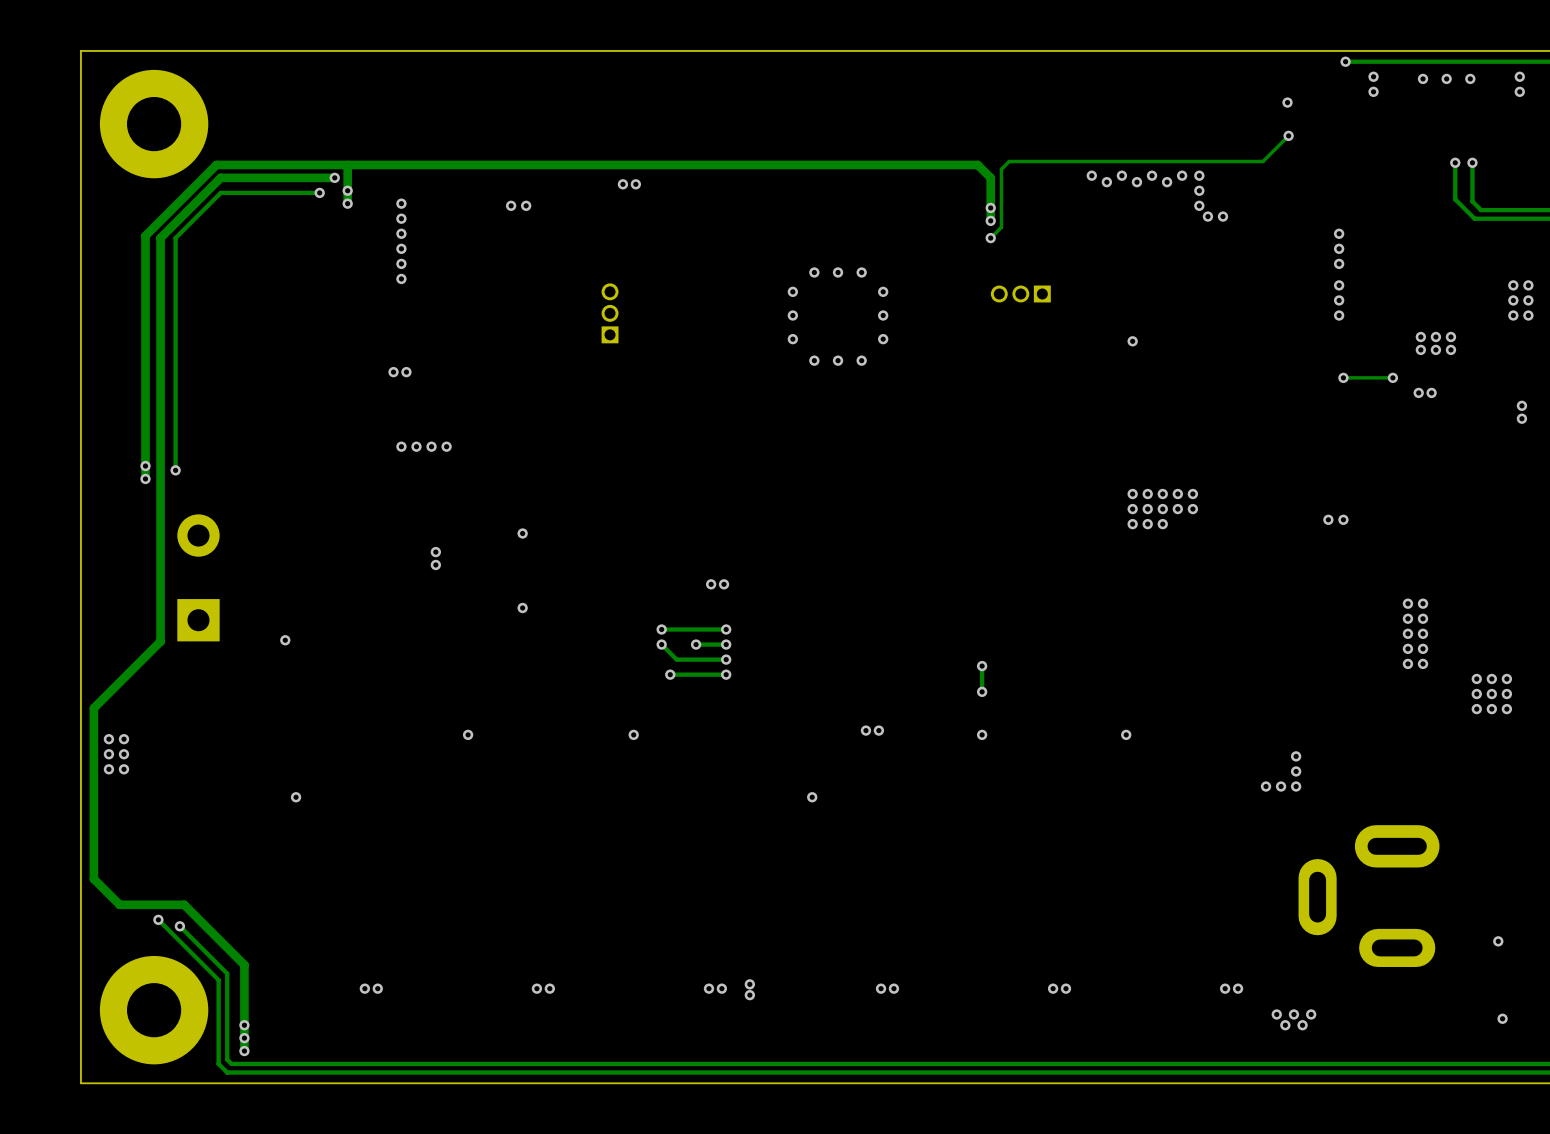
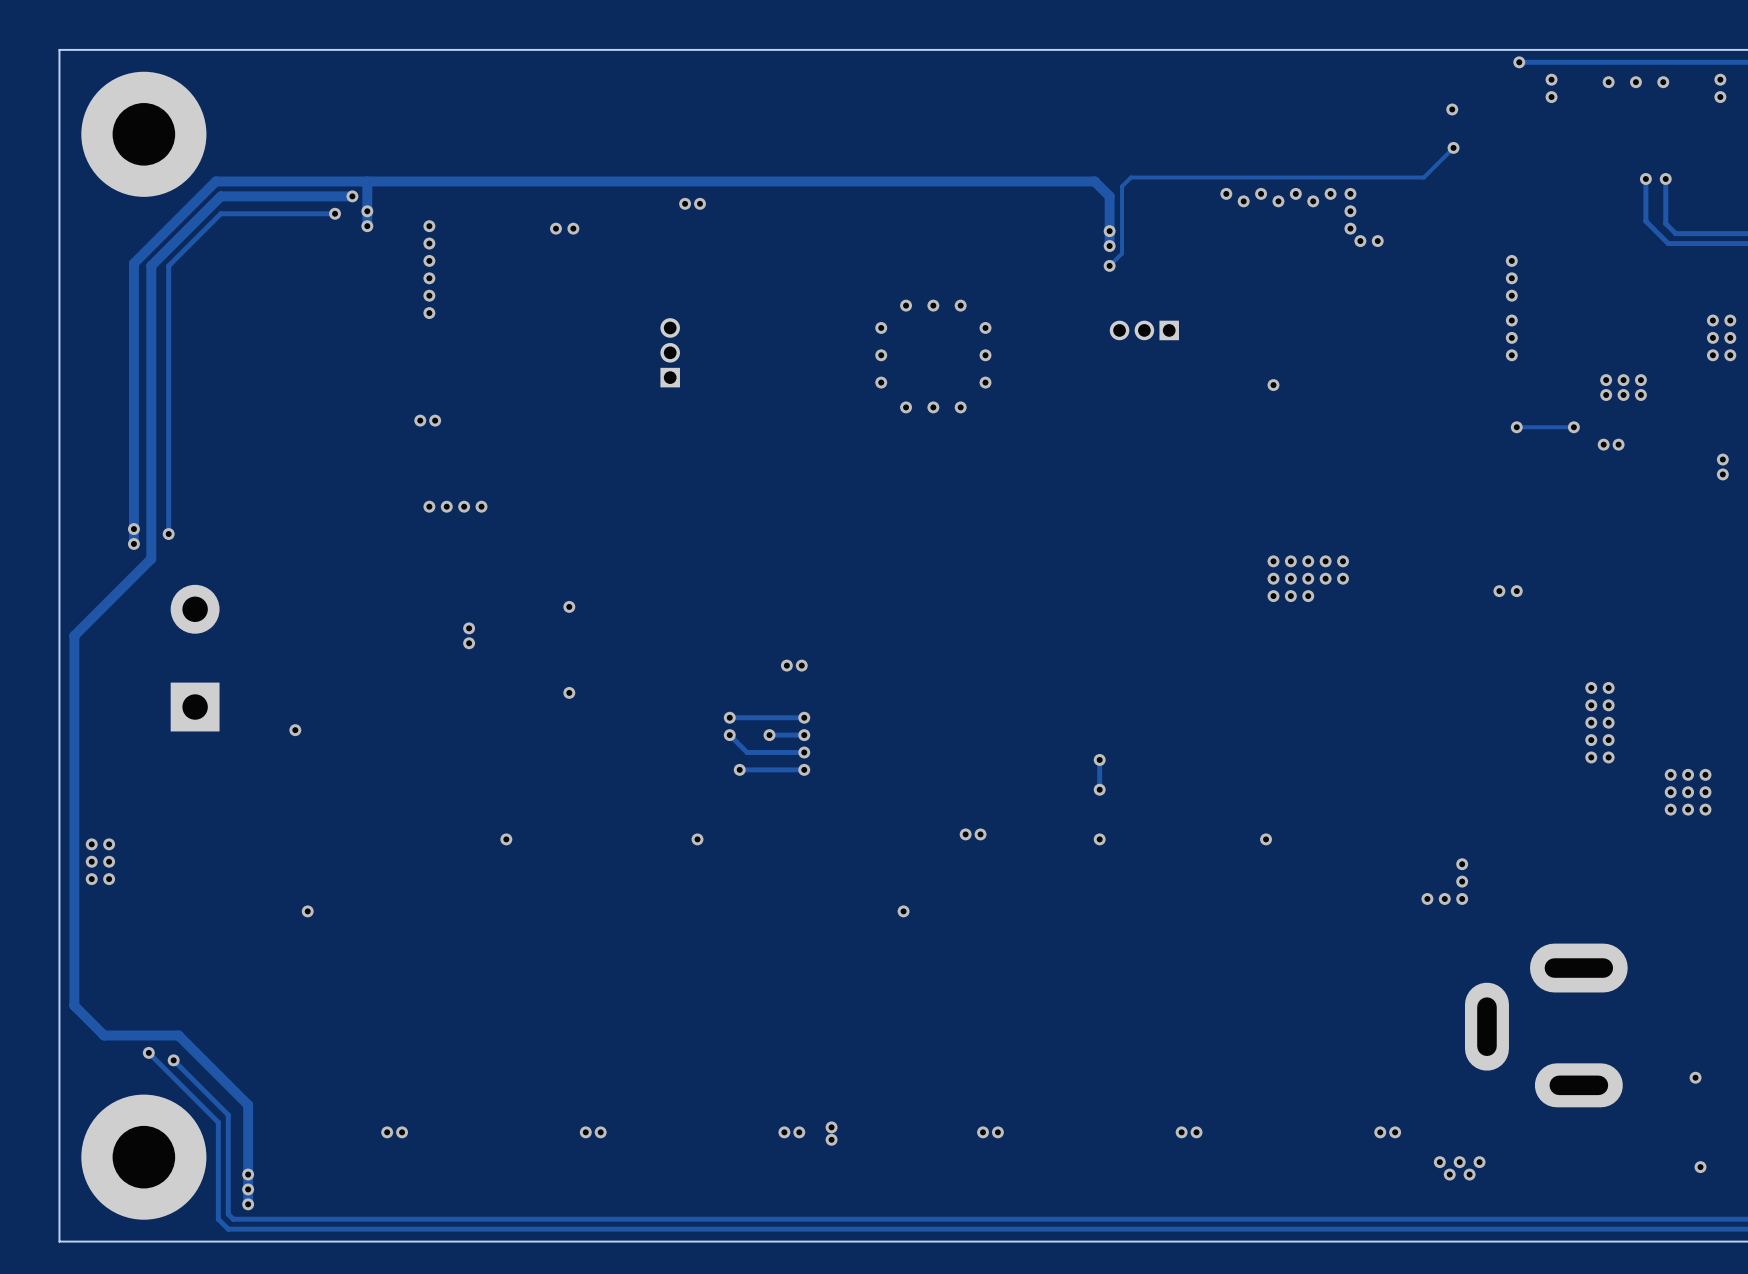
track: (160, 491) (160, 641) (93, 708) -> (151, 558) (74, 635) (74, 808)

